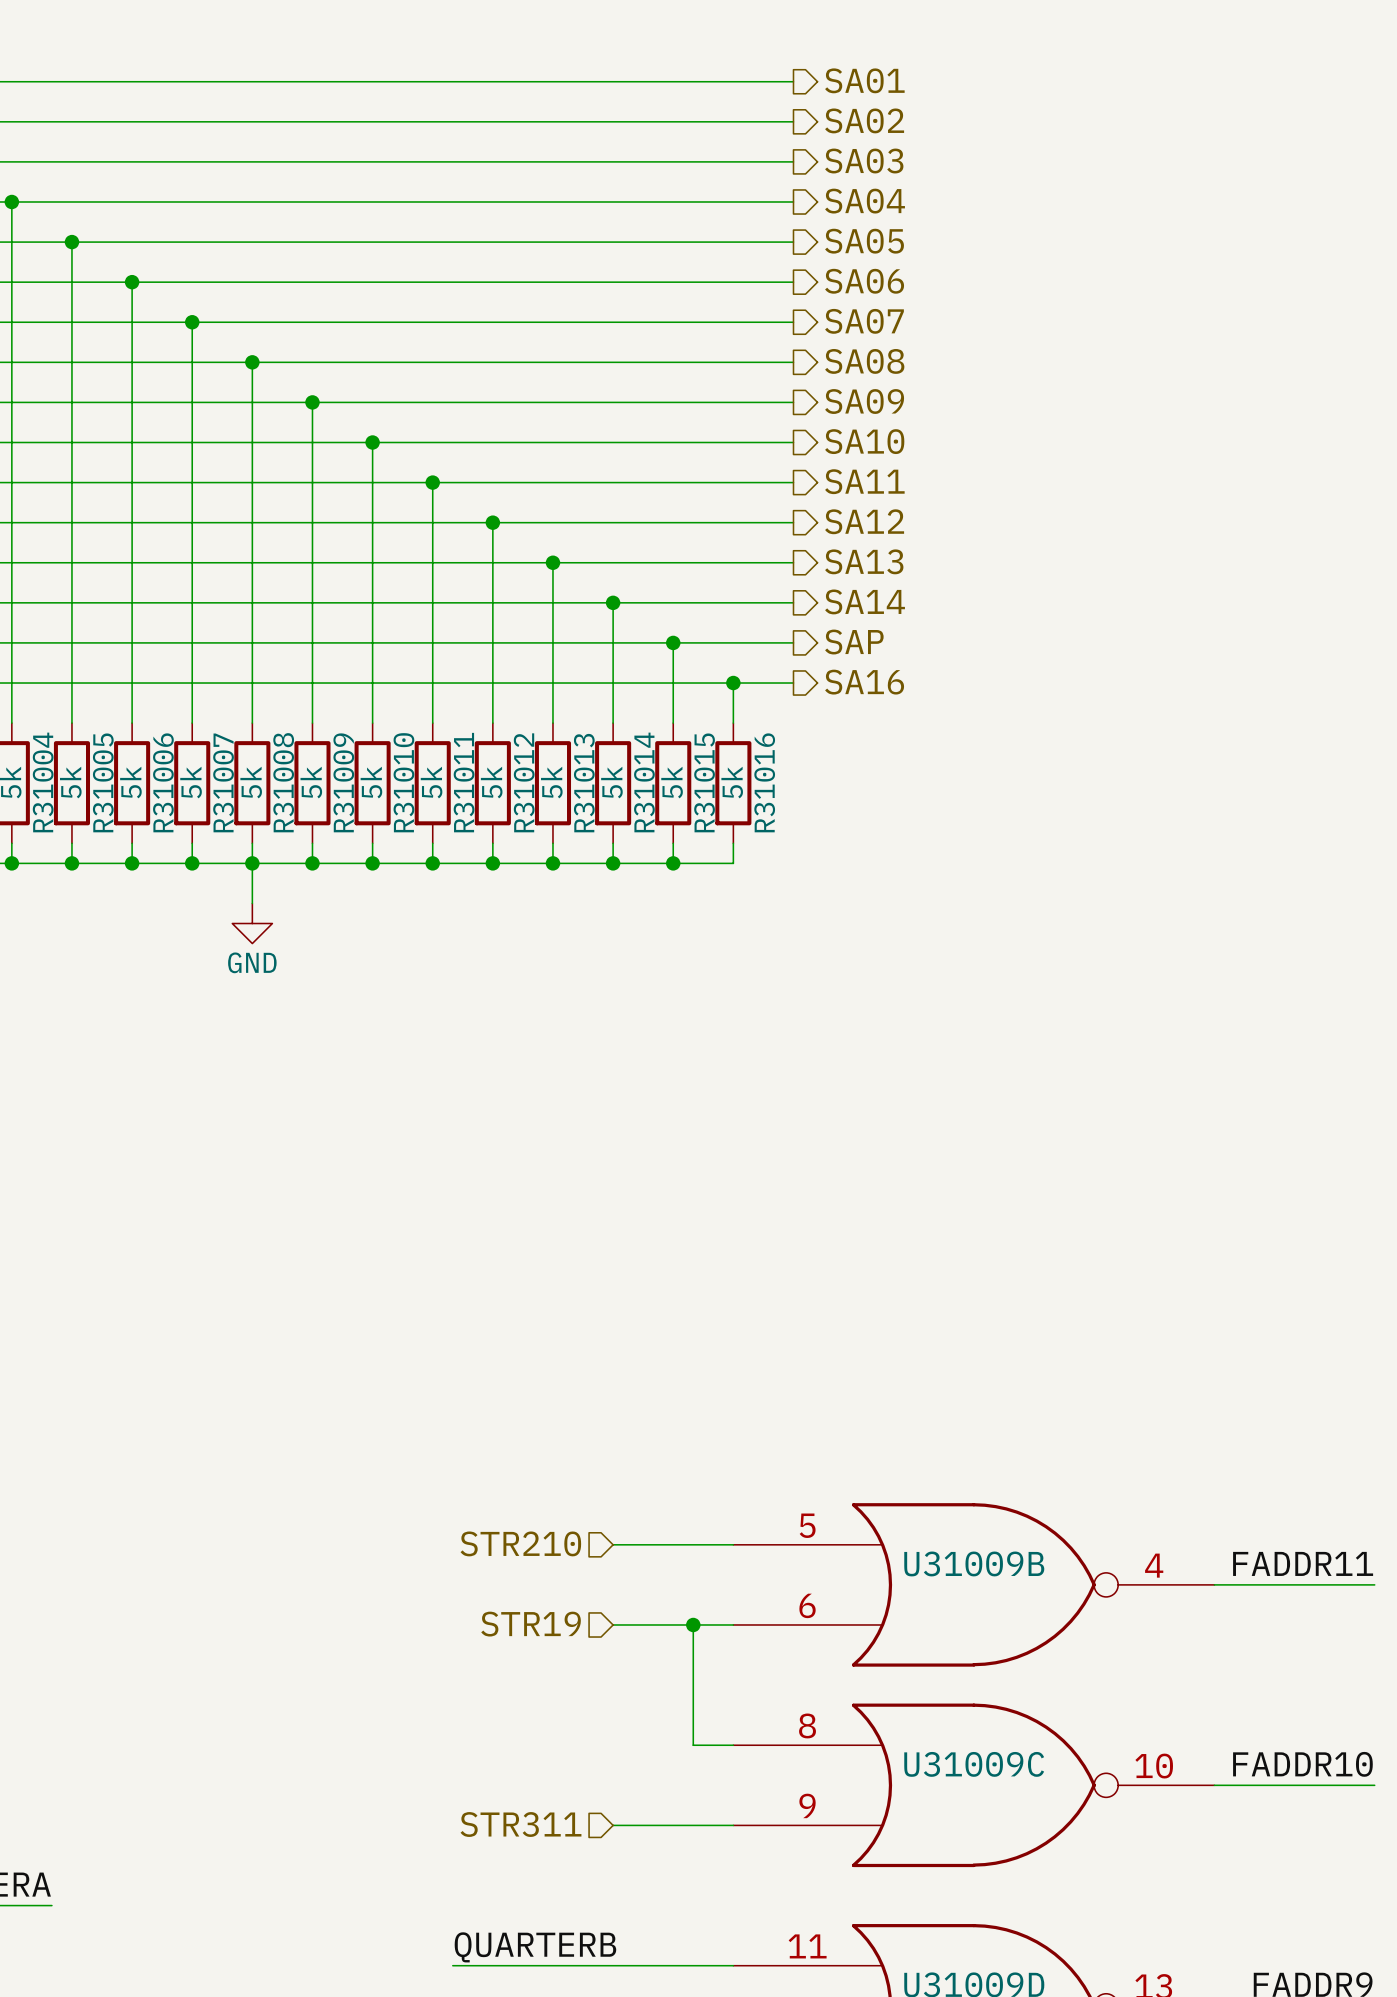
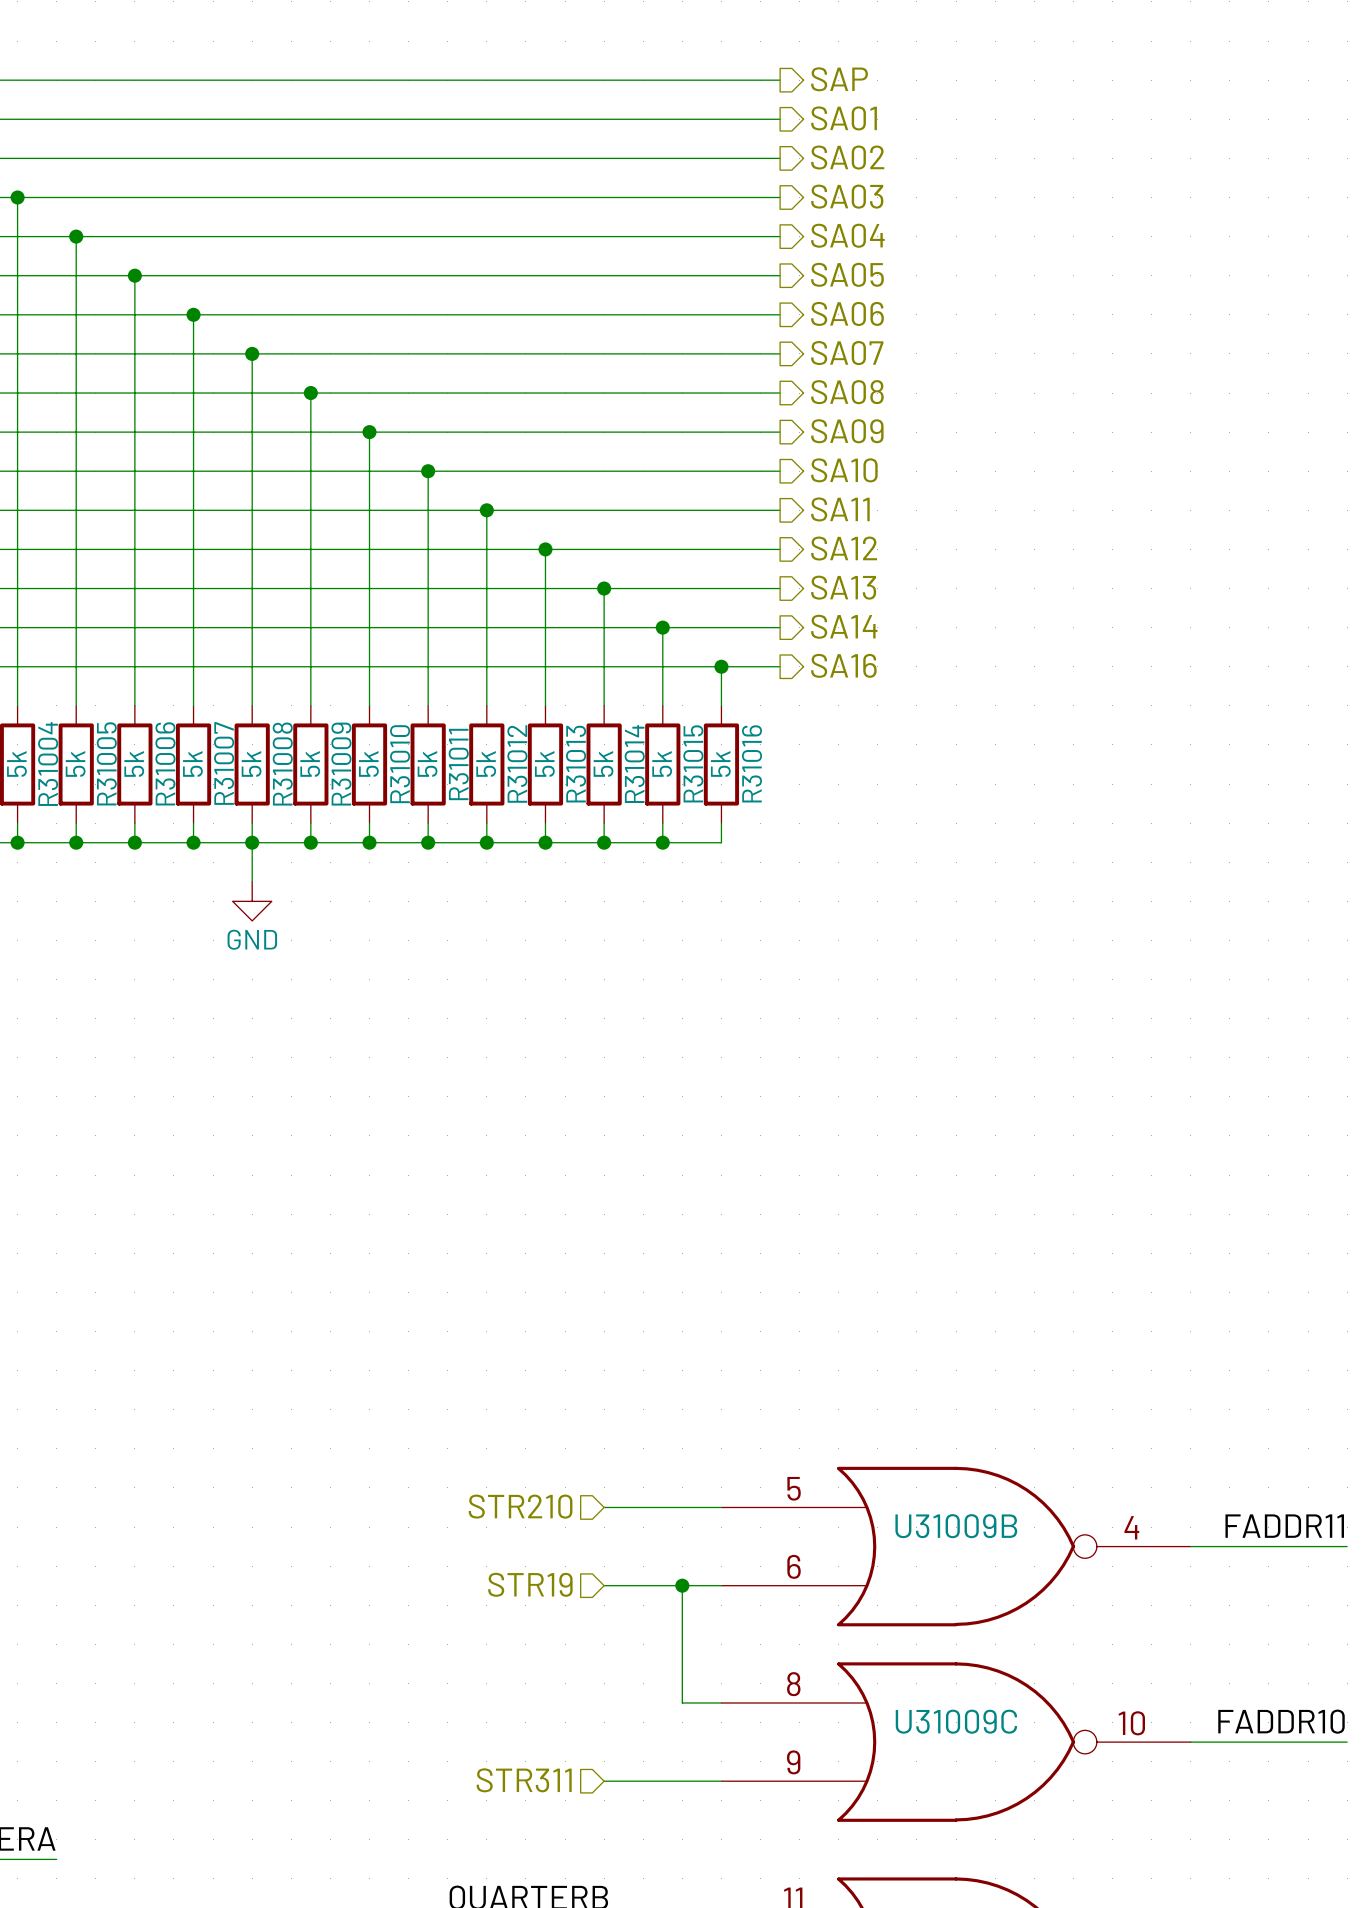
hierarchical label: SA01 (864, 80) -> SAP (839, 79)
hierarchical label: SA02 (864, 120) -> SA01 (844, 118)
hierarchical label: SA03 (864, 161) -> SA02 (847, 157)
hierarchical label: SA04 (865, 201) -> SA03 (847, 196)
hierarchical label: SA05 (864, 241) -> SA04 (847, 235)
hierarchical label: SA06 (864, 281) -> SA05 (847, 274)
hierarchical label: SA07 (864, 321) -> SA06 (847, 313)
hierarchical label: SA08 (864, 361) -> SA07 (847, 353)
hierarchical label: SA09 (864, 401) -> SA08 (847, 392)
hierarchical label: SA10 (864, 441) -> SA09 (847, 431)
hierarchical label: SA11 (864, 481) -> SA10 (844, 470)
hierarchical label: SA12 (864, 521) -> SA11 (840, 509)
hierarchical label: SA13 (864, 561) -> SA12 (844, 548)
hierarchical label: SA14 (865, 601) -> SA13 (843, 587)
hierarchical label: SAP (854, 642) -> SA14 (844, 626)

